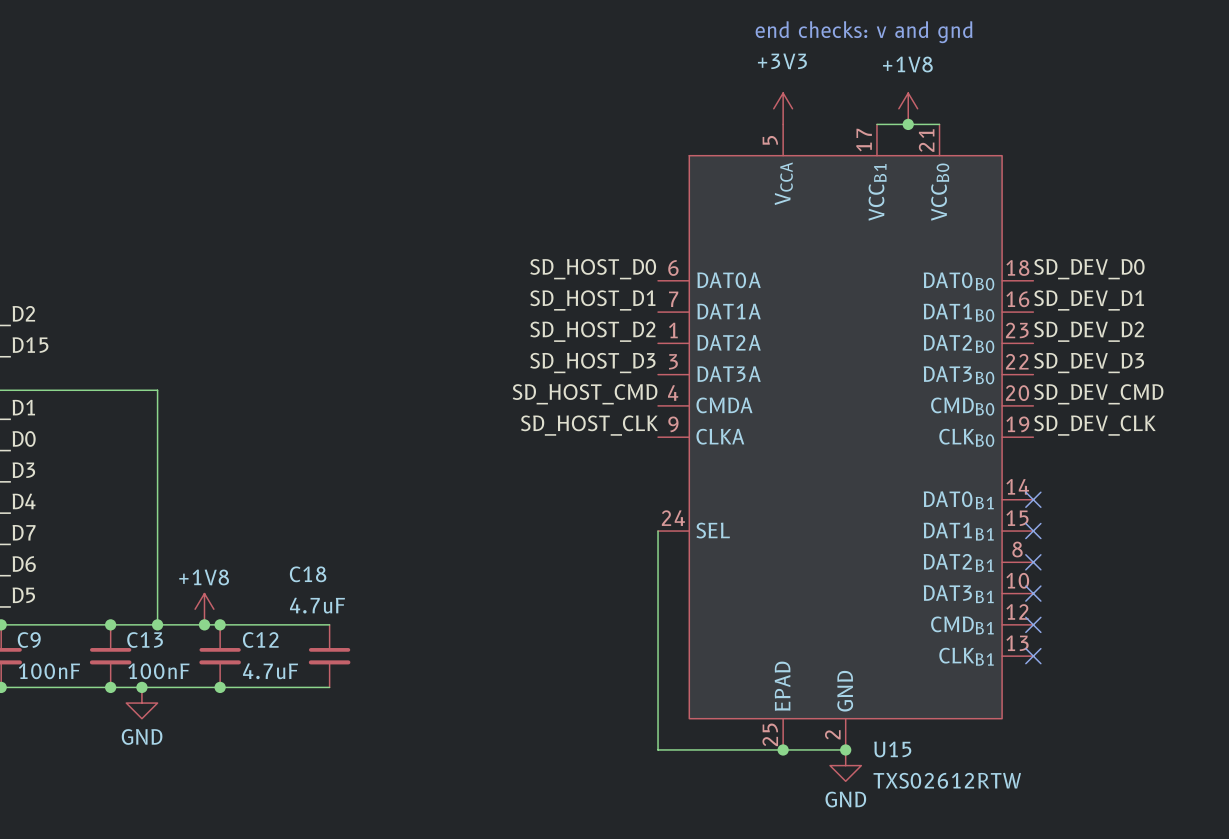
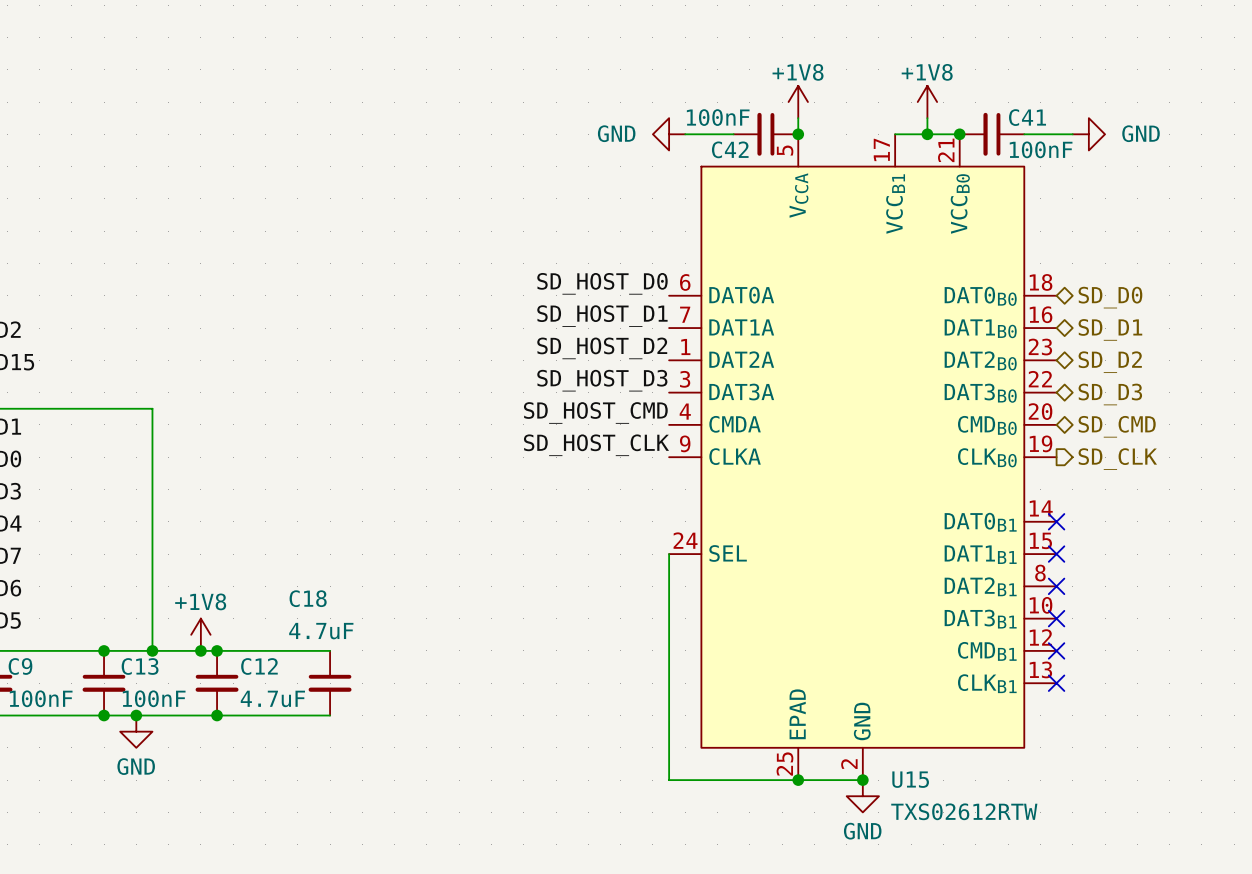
text: end checks: v and gnd (864, 32) -> none
power symbol: none -> +1V8 (798, 102)
power symbol: +3V3 (783, 108) -> none
power symbol position: +1V8 (908, 108) -> +1V8 (927, 102)
power symbol: none -> GND (669, 134)
wire: none -> (685, 134) (733, 134)
C42: none -> 100nF (765, 134)
junction: none -> (798, 134)
junction: none -> (959, 134)
C41: none -> 100nF (992, 134)
wire: none -> (1024, 134) (1072, 134)
power symbol: none -> GND (1088, 134)
label: SD_DEV_D0 (1089, 269) -> none
hierarchical label: none -> SD_D0 (1110, 297)
label: SD_DEV_D1 (1089, 300) -> none
hierarchical label: none -> SD_D1 (1110, 329)
label: SD_DEV_D2 (1089, 331) -> none
hierarchical label: none -> SD_D2 (1110, 362)
label: SD_DEV_D3 (1089, 363) -> none
hierarchical label: none -> SD_D3 (1110, 394)
label: SD_DEV_CMD (1098, 394) -> none
hierarchical label: none -> SD_CMD (1117, 426)
label: SD_DEV_CLK (1094, 425) -> none
hierarchical label: none -> SD_CLK (1117, 459)

